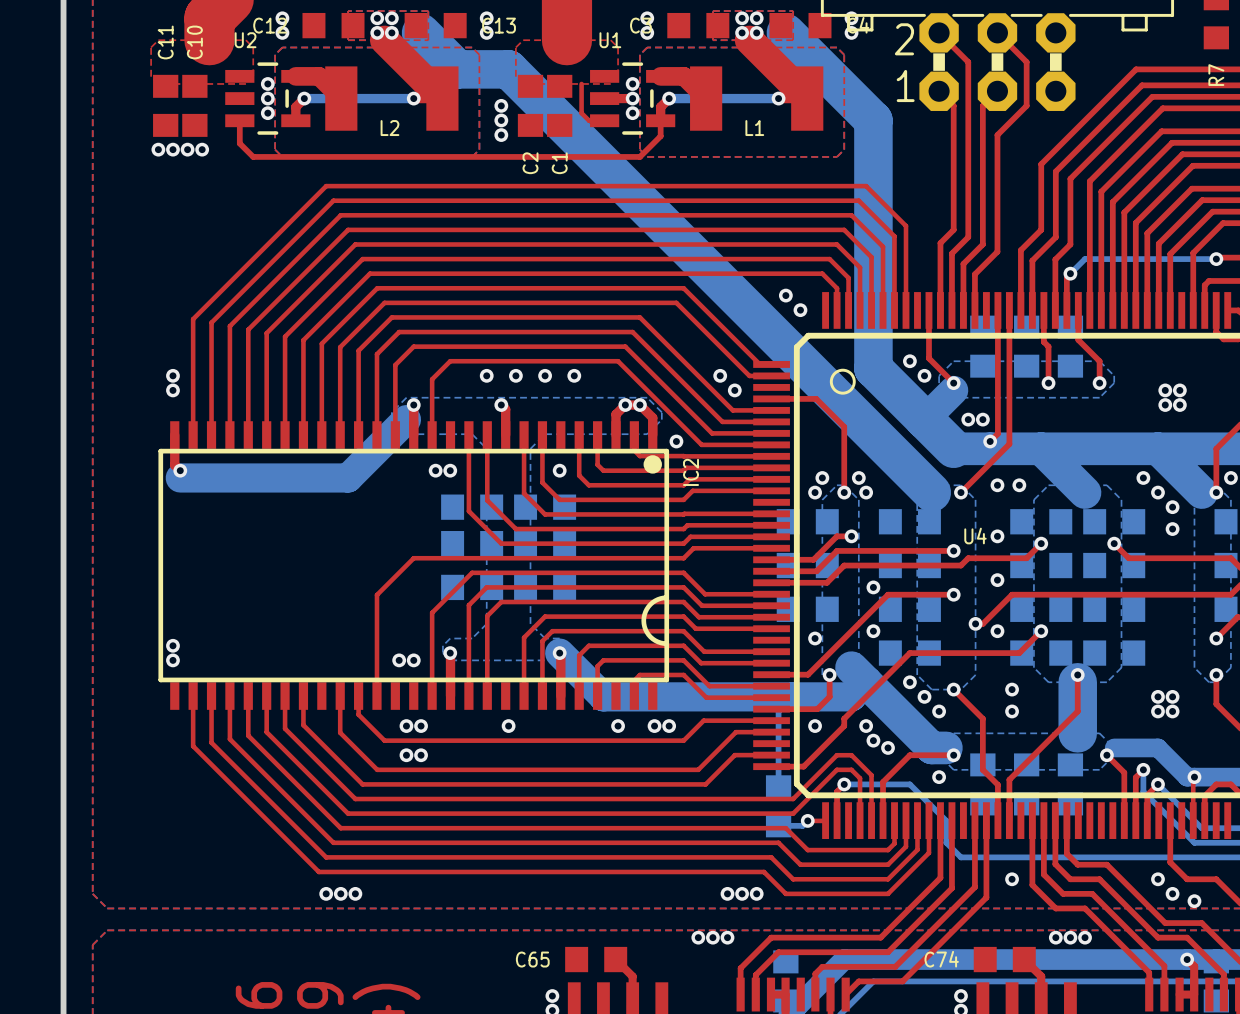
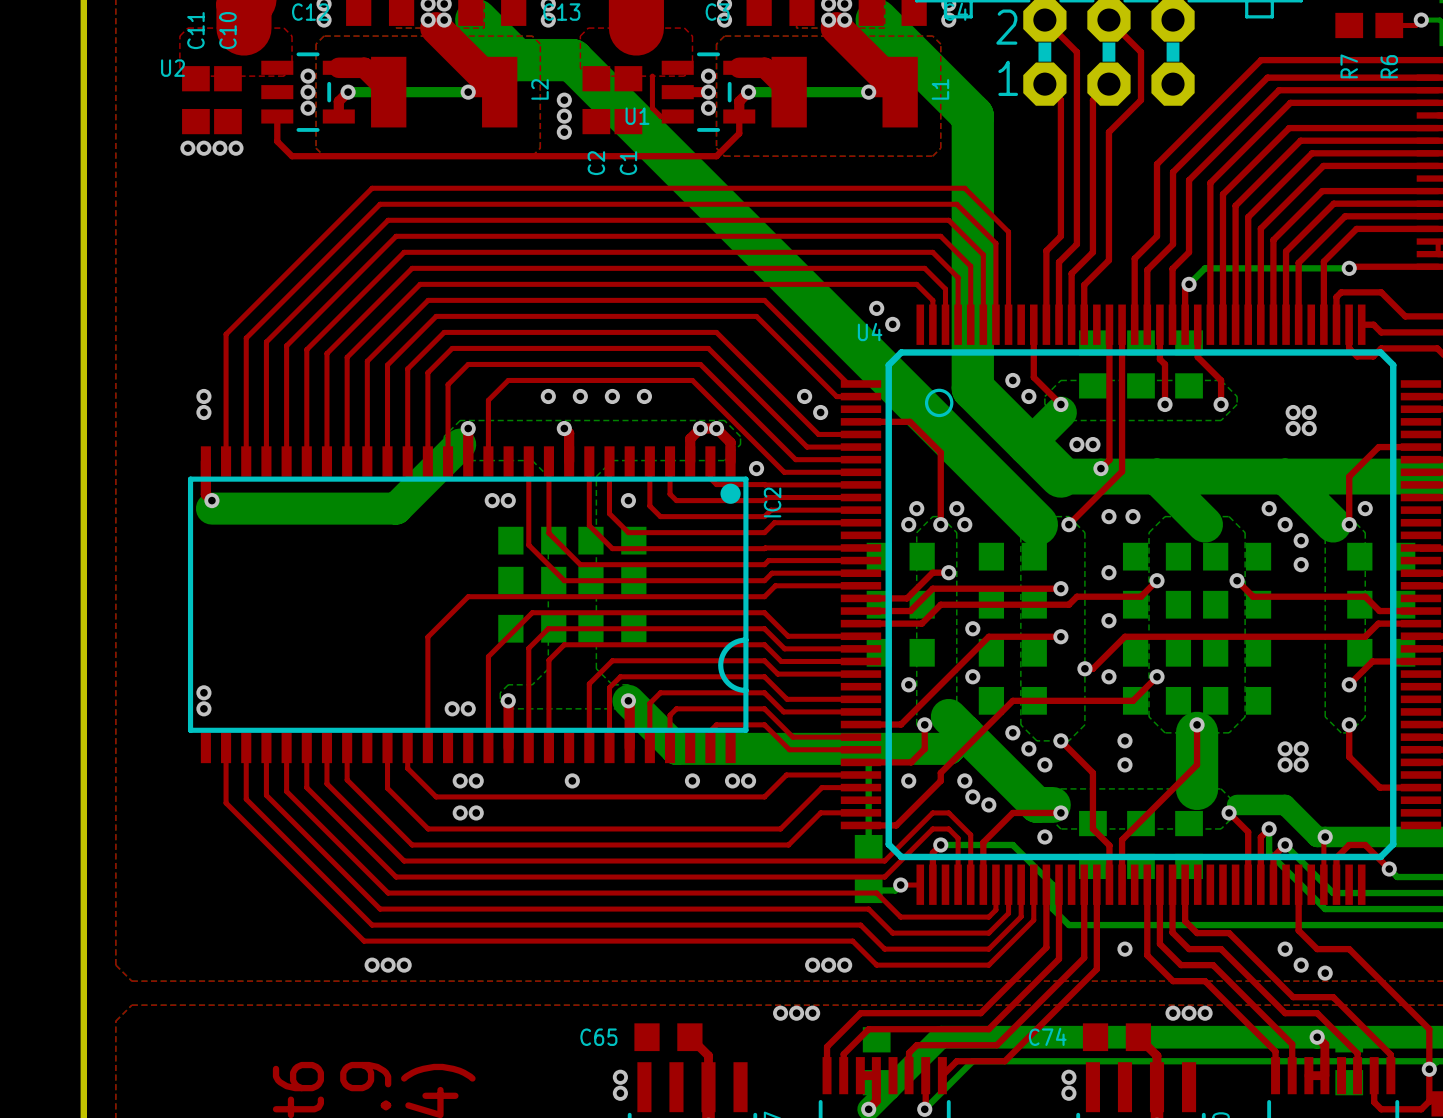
U2 name position: U2 (245, 40) -> U2 (172, 68)
U1 name position: U1 (610, 40) -> U1 (637, 116)
L2 name rotation: 0° (389, 128) -> 90° counterclockwise (539, 89)
L2 name position: L2 (389, 128) -> L2 (539, 89)
L1 name rotation: 0° (754, 128) -> 90° counterclockwise (940, 89)
L1 name position: L1 (754, 128) -> L1 (940, 89)
U4 name position: U4 (975, 536) -> U4 (870, 332)

